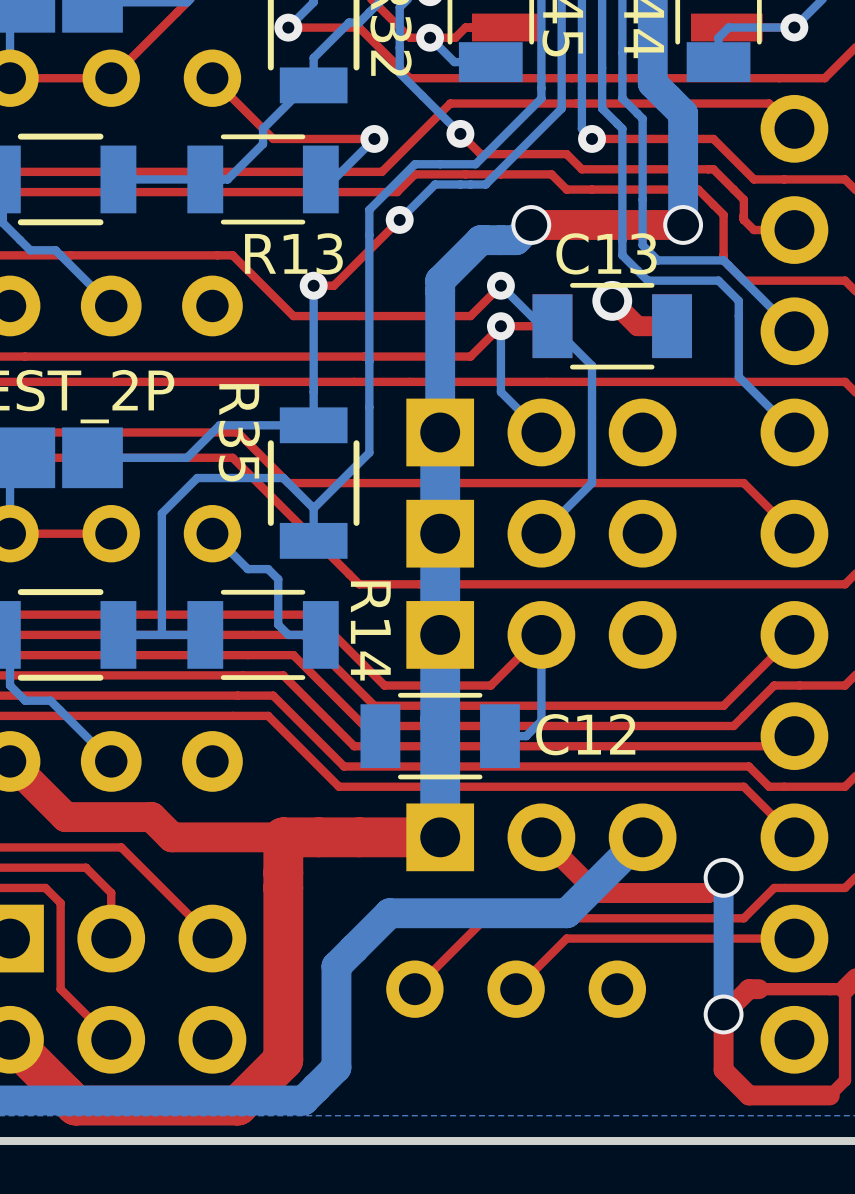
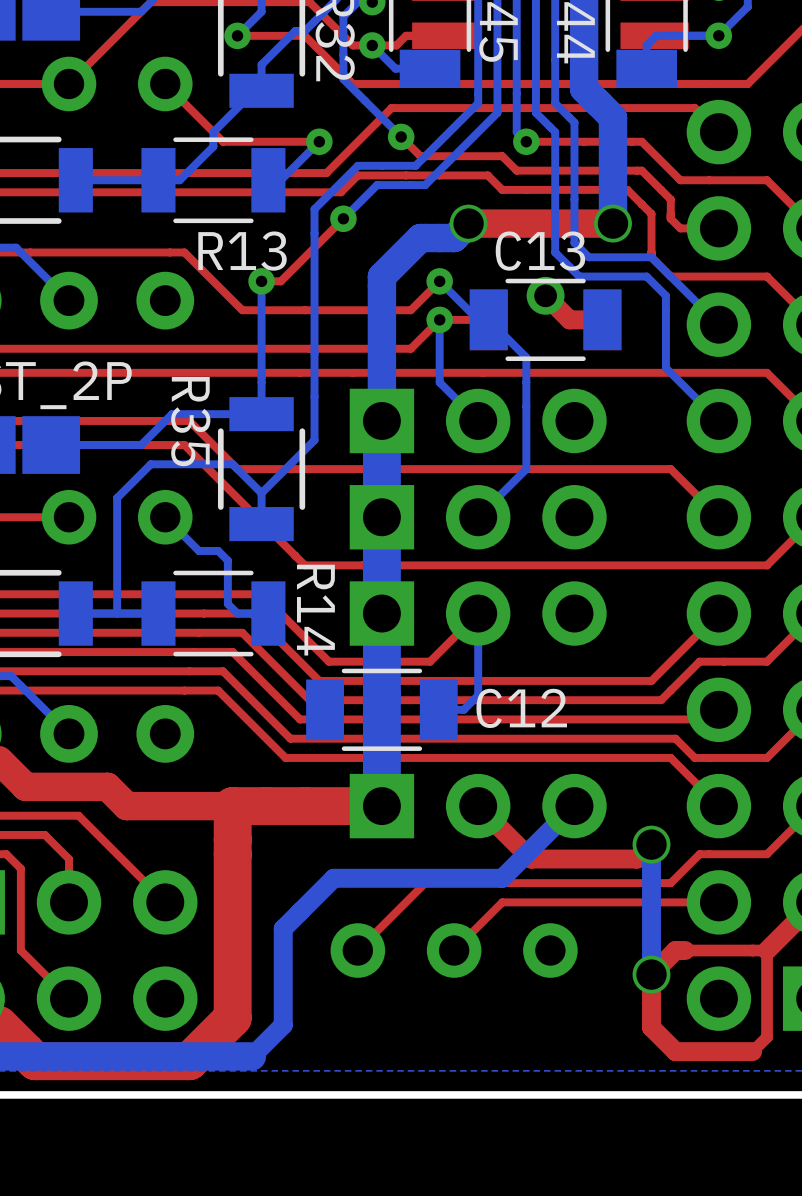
bottom track width: thick (642, 837) (566, 913) (389, 913) (336, 966) (336, 1067) (303, 1100) -> thin (574, 806) (502, 878) (333, 878) (283, 928) (283, 1025) (251, 1056)

